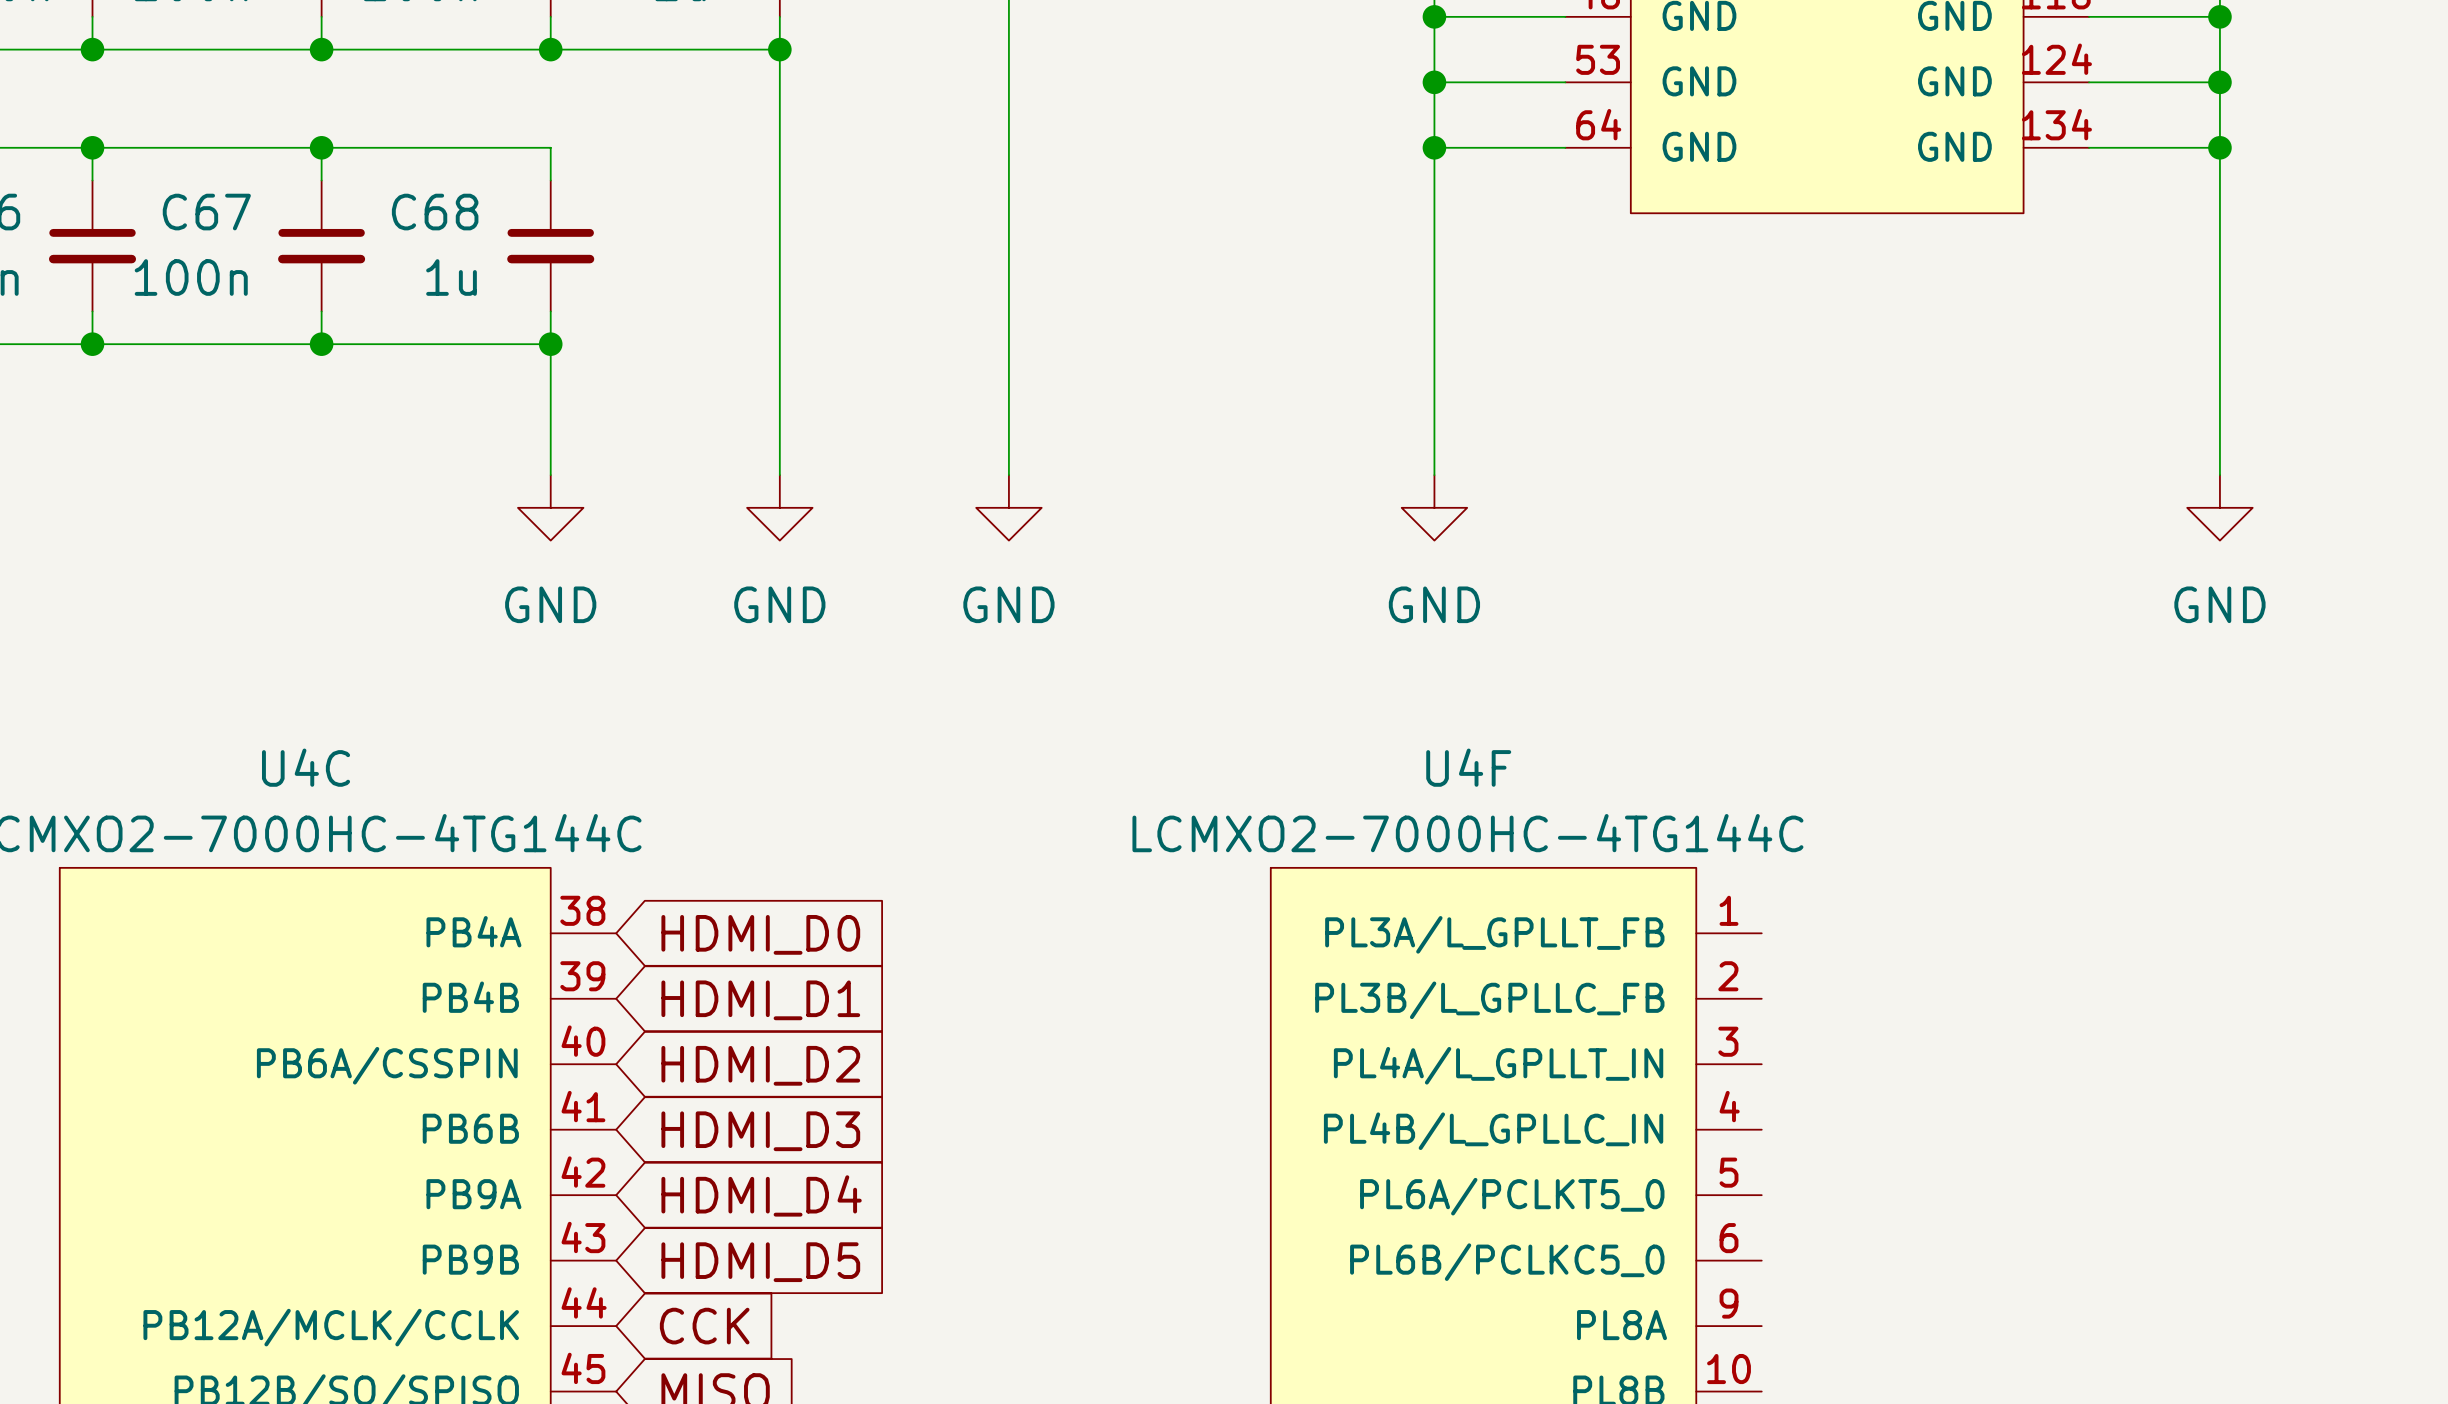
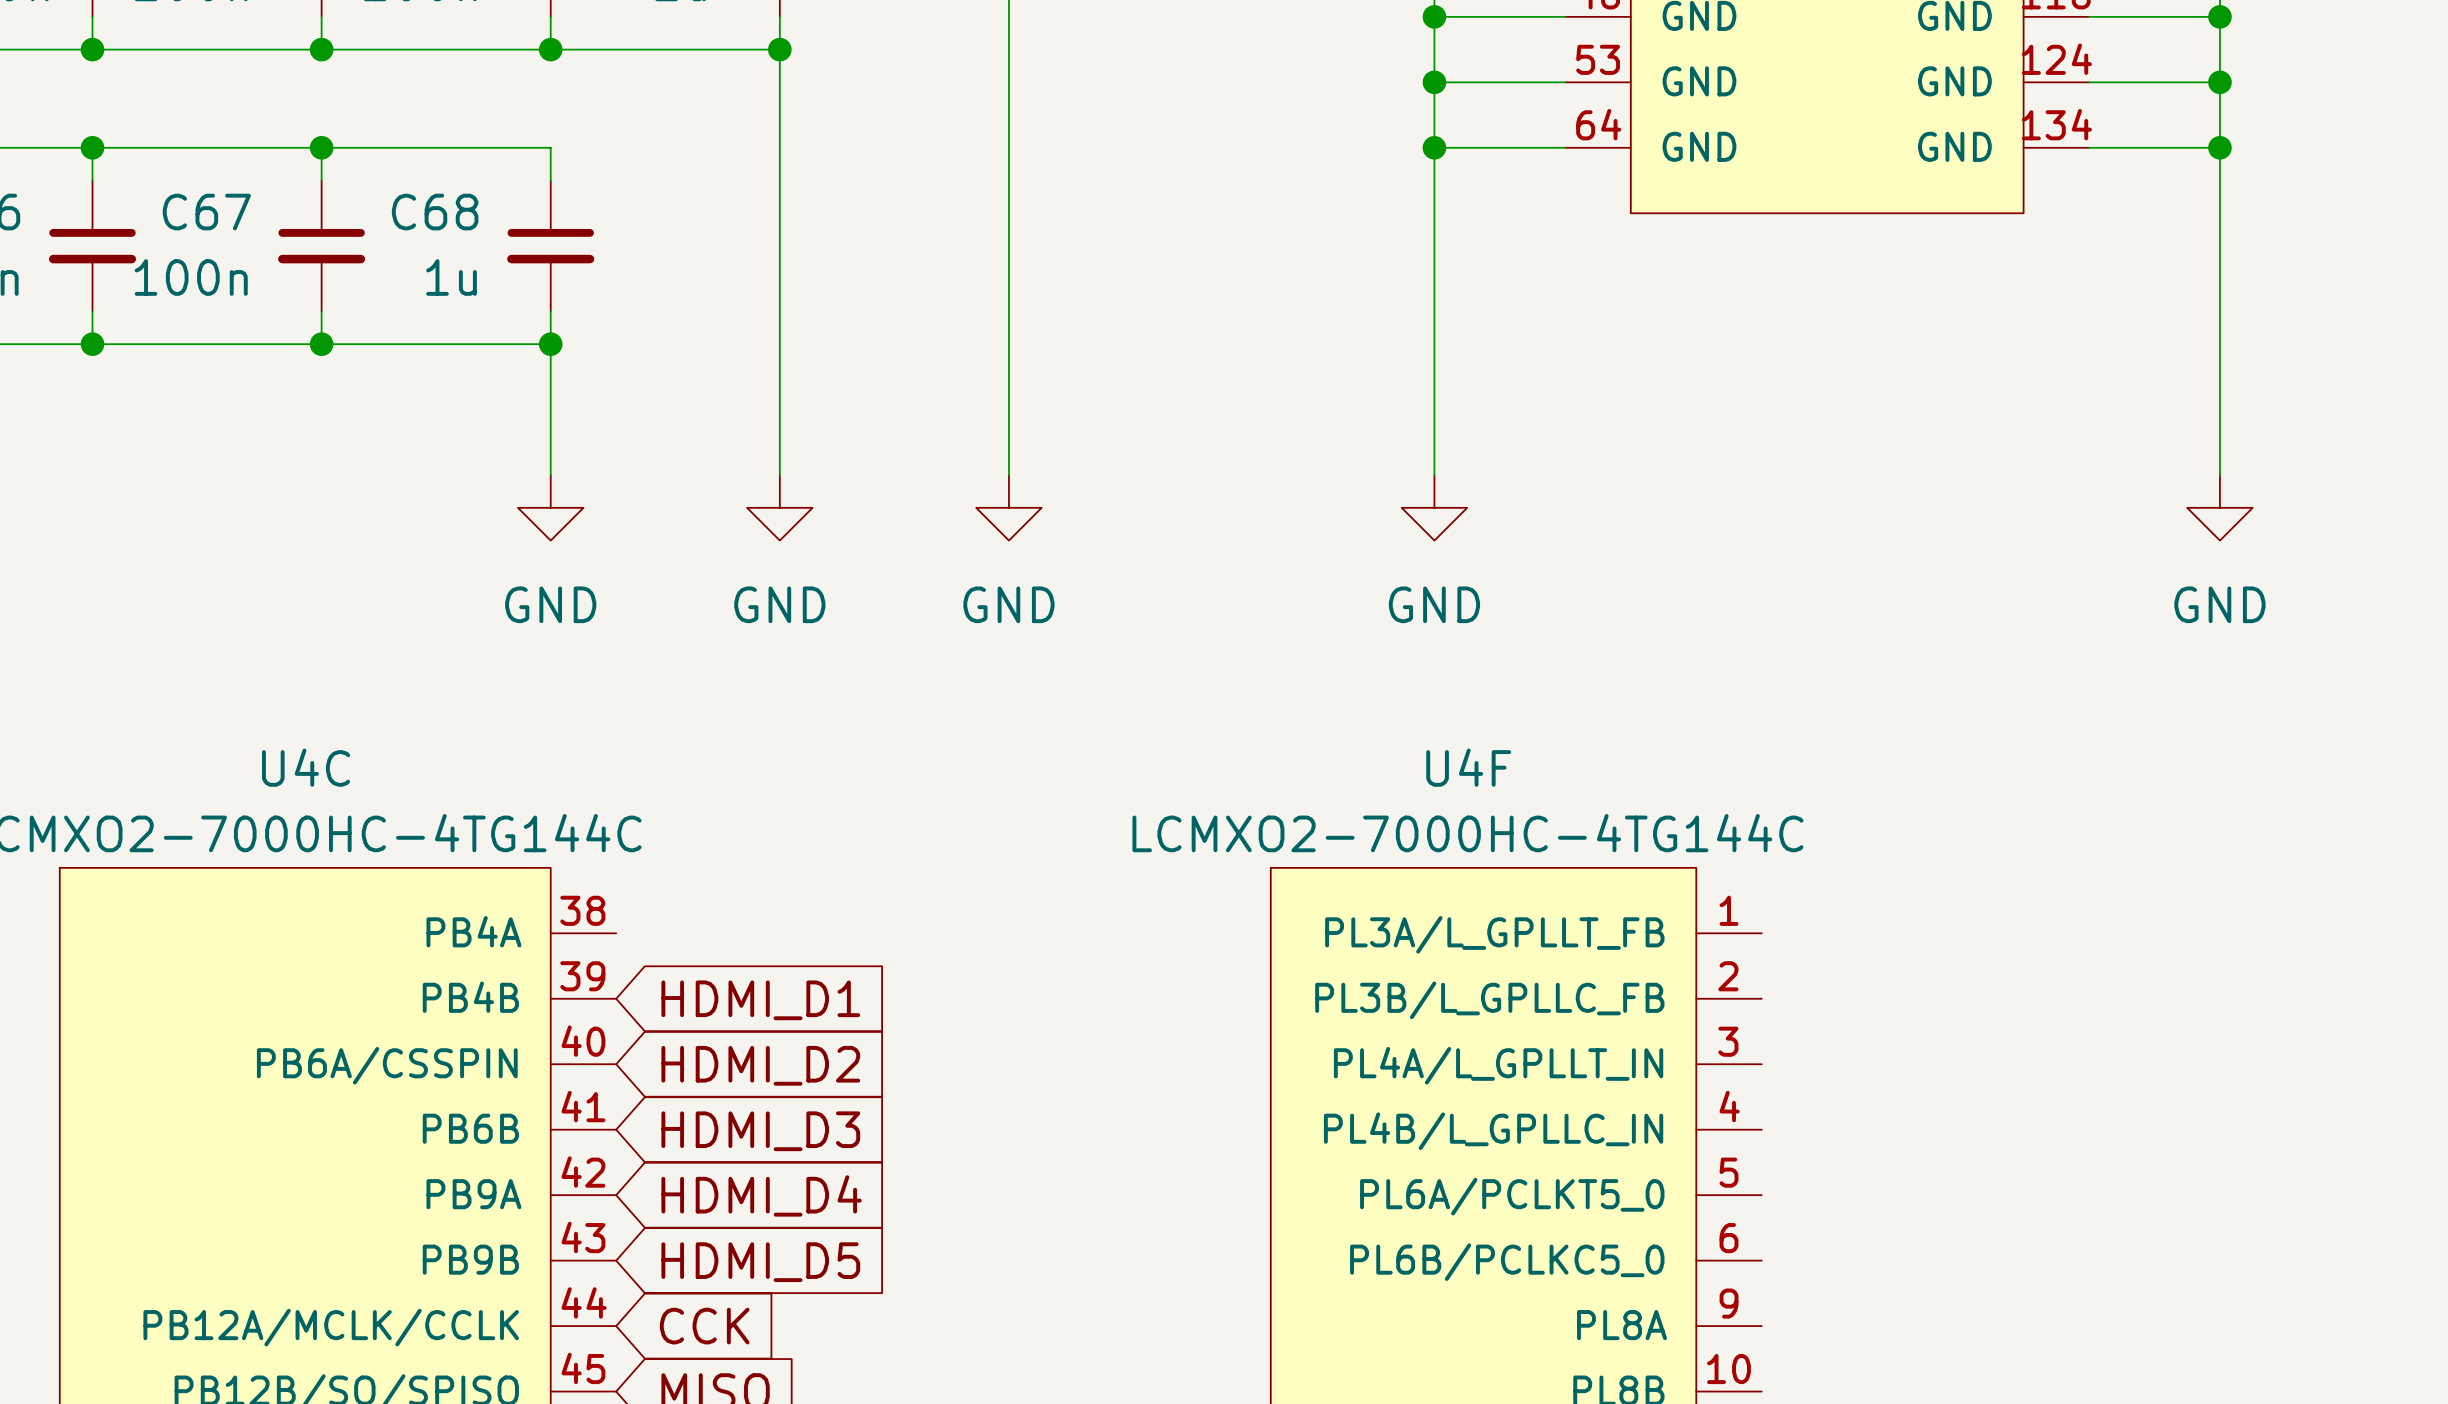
global label: HDMI_D0 (760, 934) -> none

